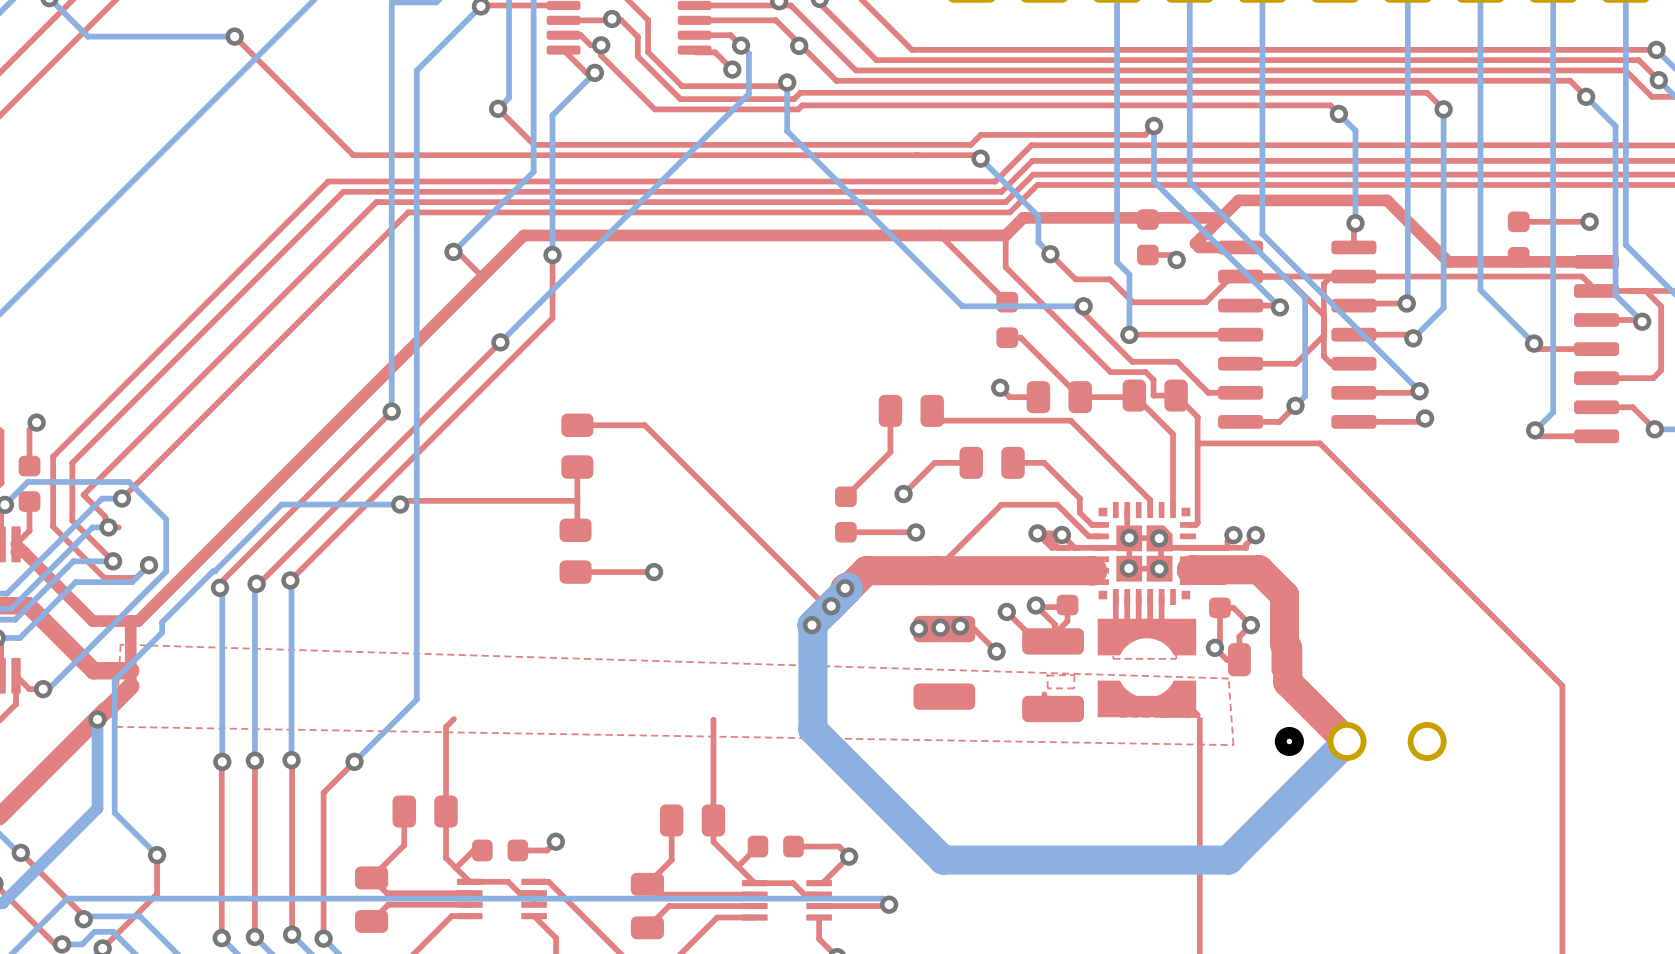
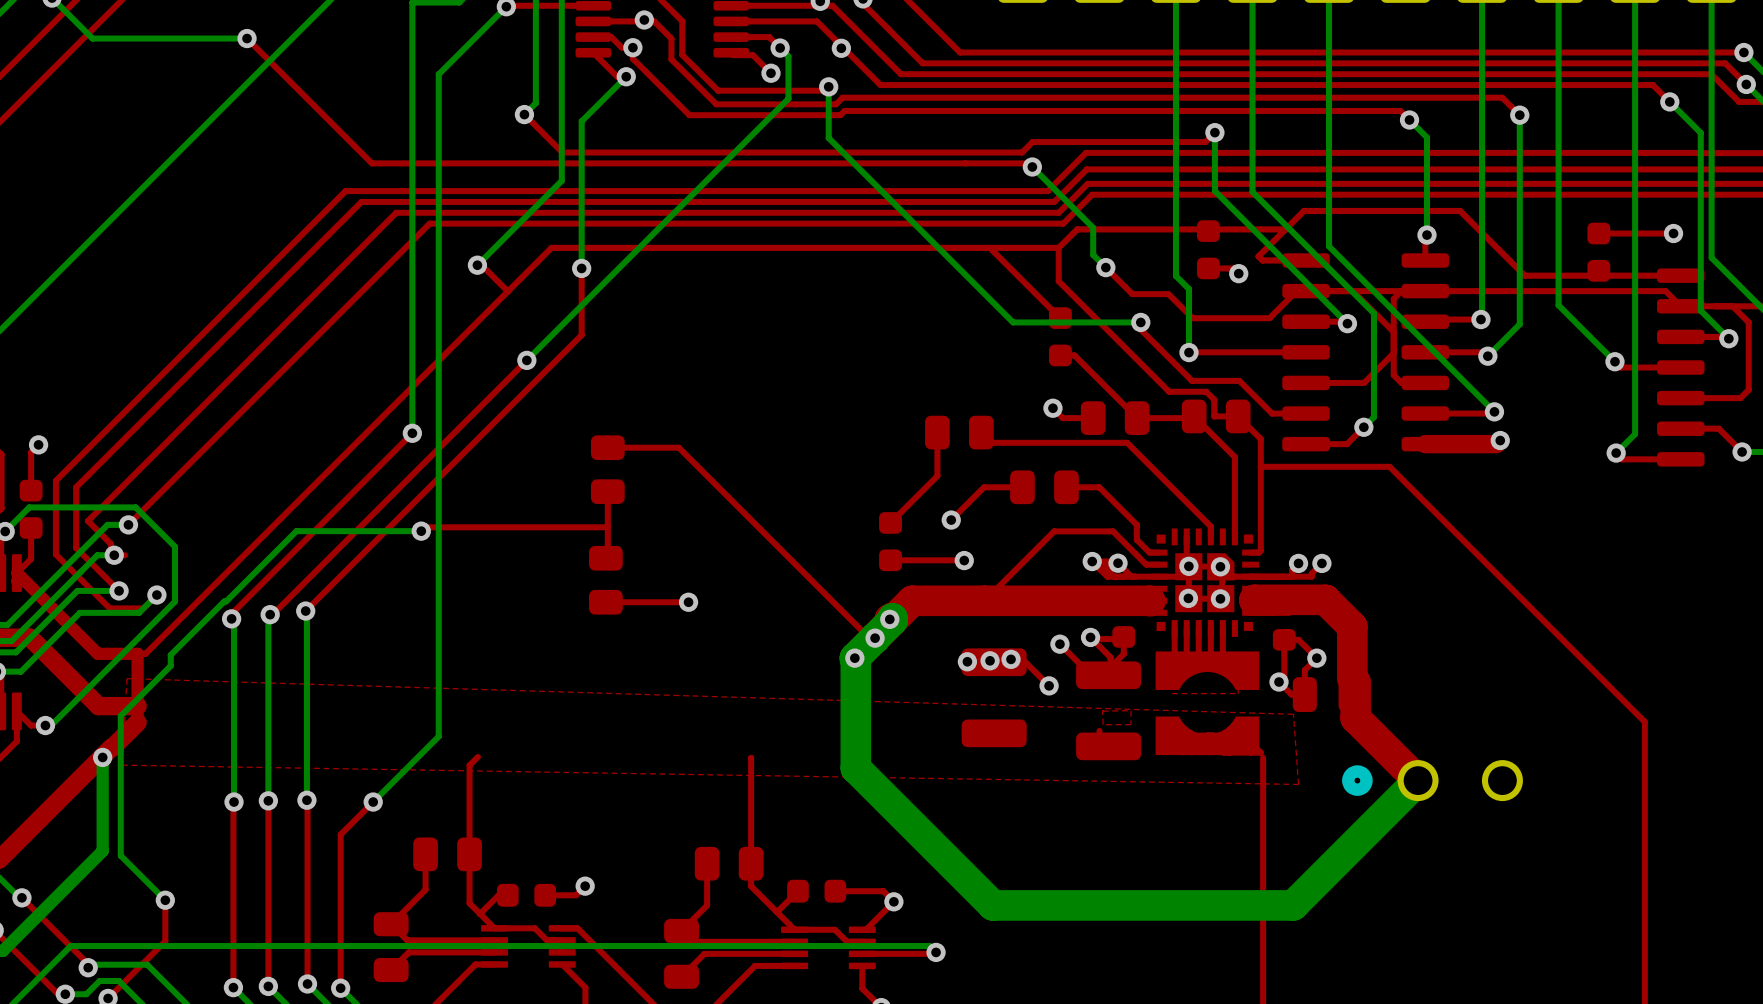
top track width: thick (1221, 217) (1023, 217) (1005, 235) (523, 235) (138, 621) (130, 621) -> thin (1285, 229) (1077, 229) (1058, 247) (551, 247) (145, 653) (137, 653)
top track width: thick (1240, 247) (1199, 247) (1195, 243) (1238, 200) (1386, 200) (1448, 261) (1596, 261) -> thin (1306, 260) (1262, 260) (1258, 256) (1303, 210) (1460, 210) (1524, 275) (1680, 275)
top track width: thin (1421, 421) (1353, 421) -> thick (1496, 444) (1425, 444)

